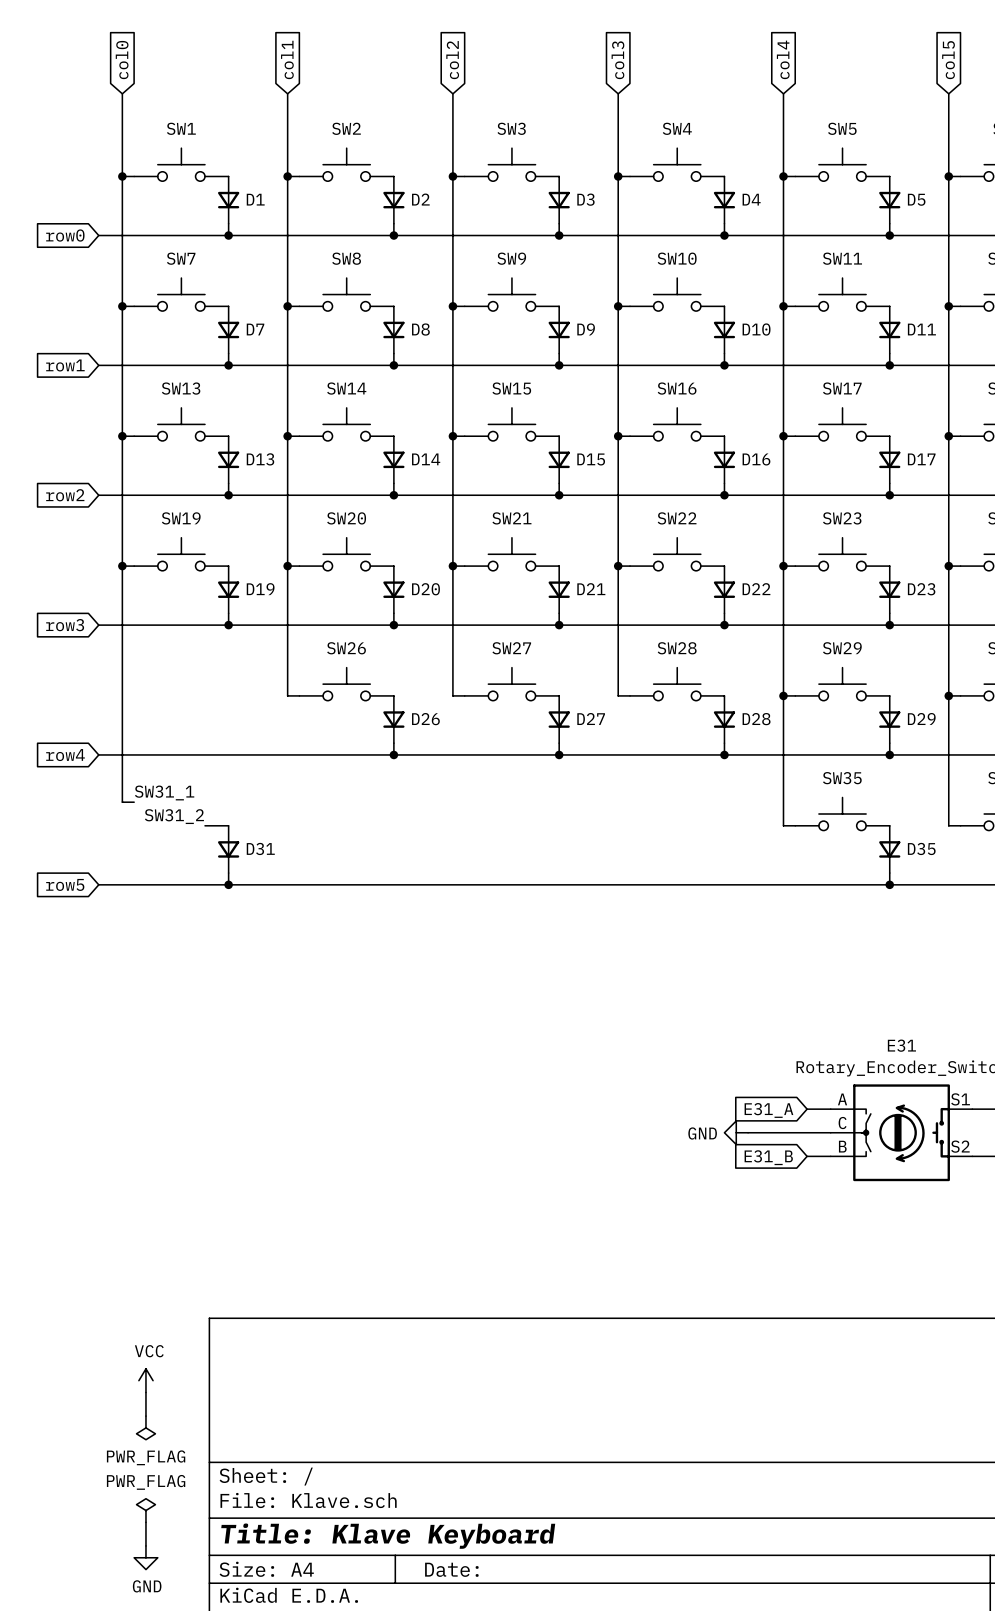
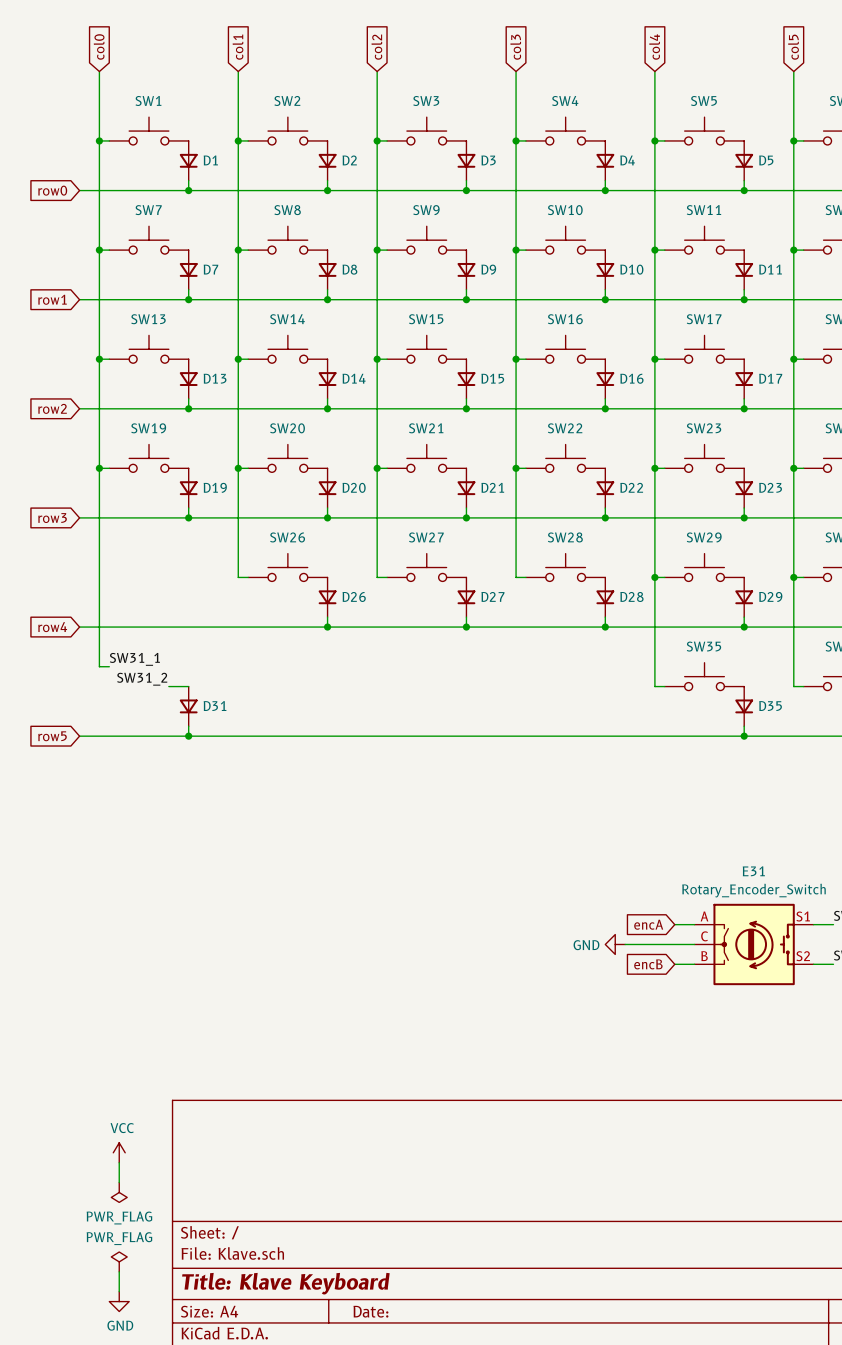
global label: E31_A (768, 1110) -> encA (648, 924)
global label: E31_B (768, 1157) -> encB (648, 964)

